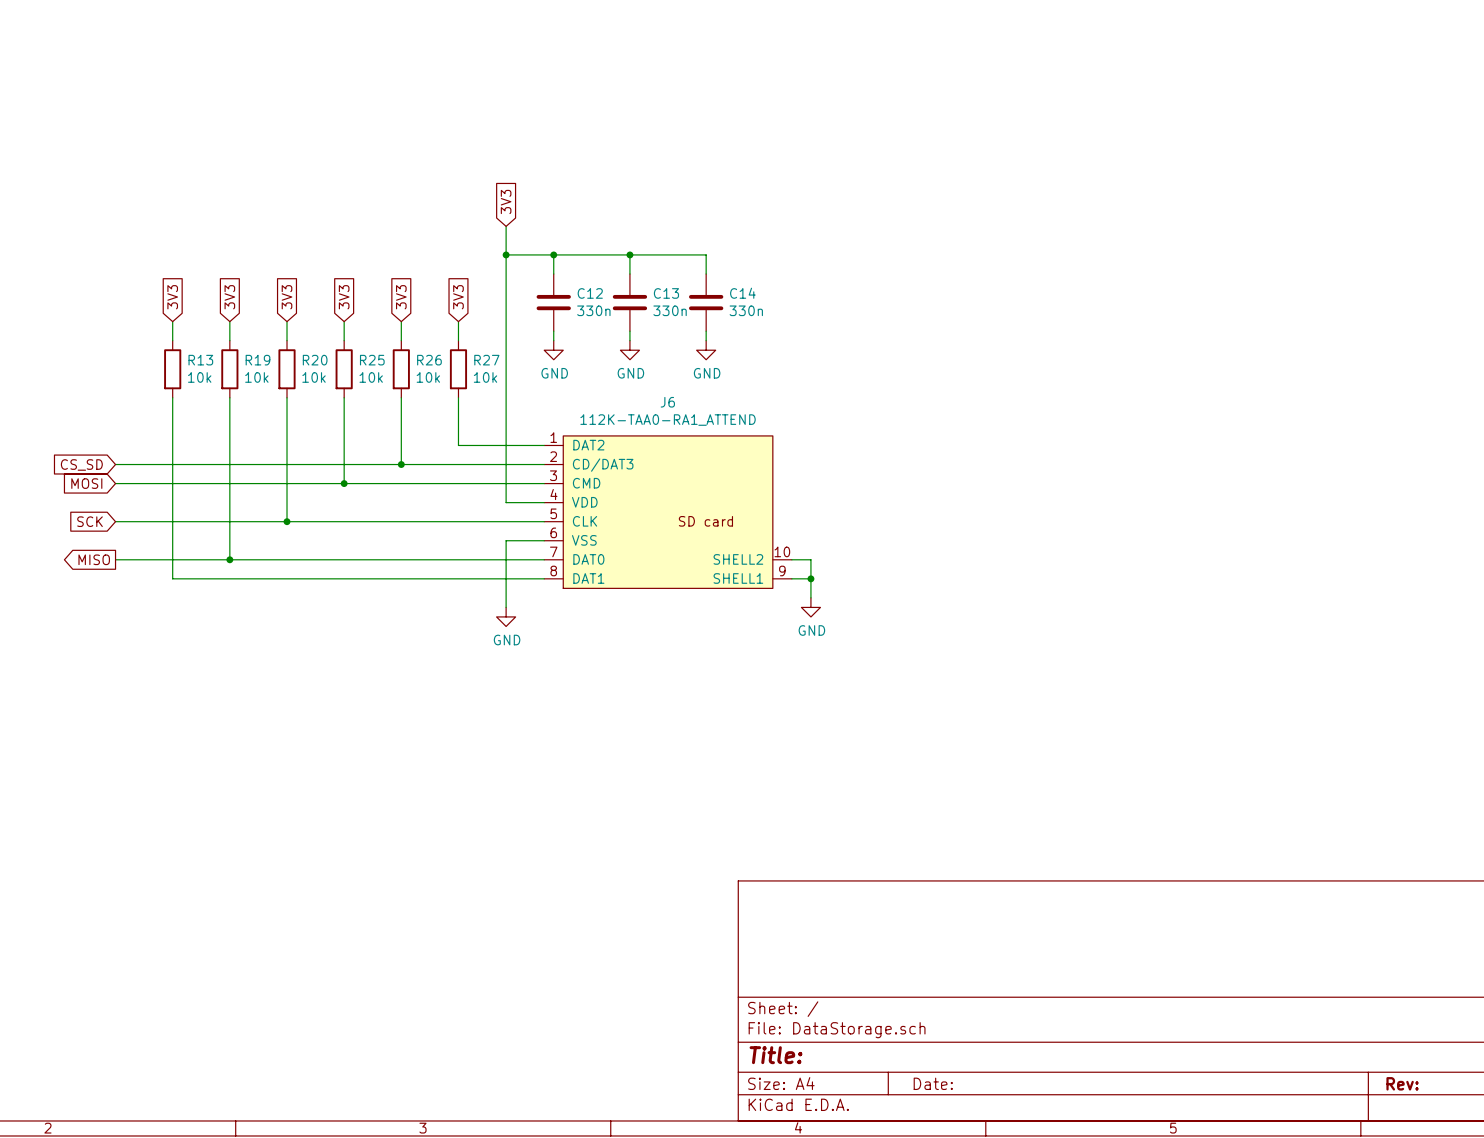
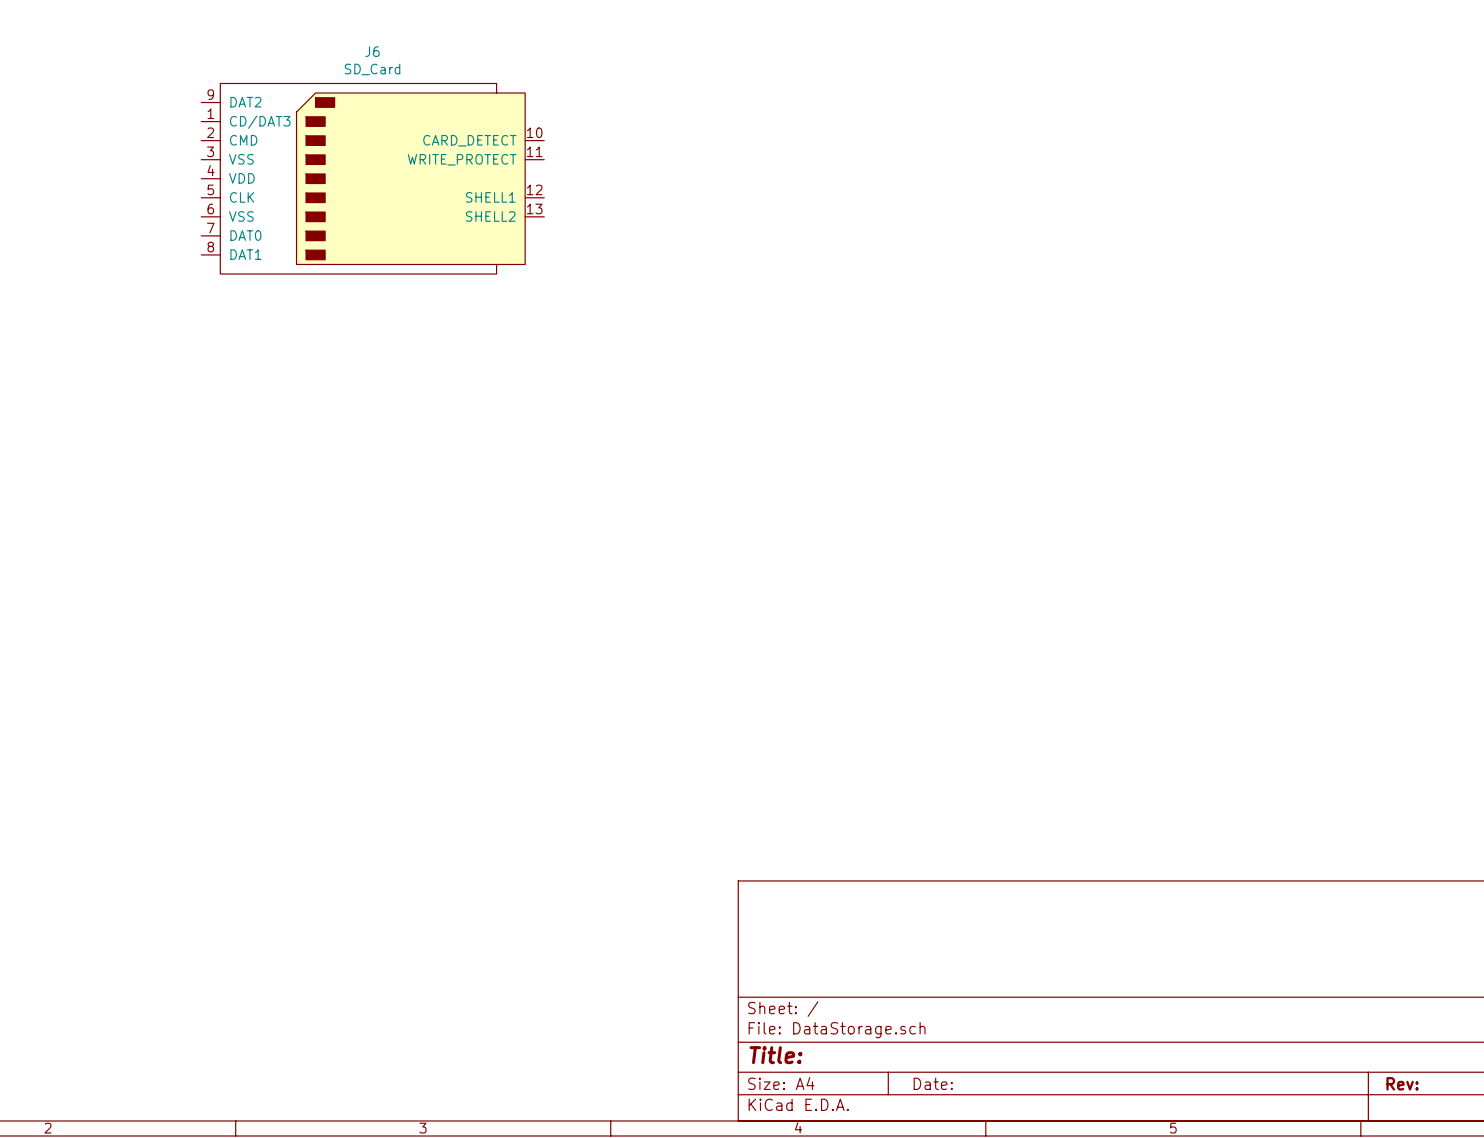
global label: 3V3 (506, 201) -> none
wire: (506, 226) (506, 502) (544, 502) -> none
wire: (506, 254) (706, 254) (706, 274) -> none
junction: (506, 254) -> none
wire: (553, 254) (553, 274) -> none
junction: (553, 254) -> none
wire: (629, 254) (629, 274) -> none
junction: (629, 254) -> none
global label: 3V3 (172, 297) -> none
global label: 3V3 (229, 297) -> none
global label: 3V3 (287, 297) -> none
global label: 3V3 (344, 297) -> none
global label: 3V3 (401, 297) -> none
global label: 3V3 (458, 297) -> none
C12: 330n (553, 302) -> none
C13: 330n (629, 302) -> none
C14: 330n (706, 302) -> none
wire: (172, 321) (172, 340) -> none
wire: (229, 321) (229, 340) -> none
wire: (287, 321) (287, 340) -> none
wire: (344, 321) (344, 340) -> none
wire: (401, 321) (401, 340) -> none
wire: (458, 321) (458, 340) -> none
wire: (553, 331) (553, 340) -> none
wire: (629, 331) (629, 340) -> none
wire: (706, 331) (706, 340) -> none
power symbol: GND (553, 350) -> none
power symbol: GND (629, 350) -> none
power symbol: GND (706, 350) -> none
R13: 10k (172, 369) -> none
R19: 10k (229, 369) -> none
R20: 10k (287, 369) -> none
R25: 10k (344, 369) -> none
R26: 10k (401, 369) -> none
R27: 10k (458, 369) -> none
wire: (172, 397) (172, 578) (544, 578) -> none
wire: (229, 397) (229, 559) -> none
wire: (287, 397) (287, 521) -> none
wire: (344, 397) (344, 483) -> none
wire: (401, 397) (401, 464) -> none
wire: (458, 397) (458, 445) (544, 445) -> none
J6 name position: J6 (667, 402) -> J6 (372, 51)
J6 value: 112K-TAA0-RA1_ATTEND (668, 420) -> SD_Card (372, 69)
J6 symbol: [544, 435, 792, 589] -> [201, 83, 545, 275]
global label: CS_SD (81, 464) -> none
wire: (115, 464) (544, 464) -> none
junction: (401, 464) -> none
global label: MOSI (86, 483) -> none
wire: (115, 483) (544, 483) -> none
junction: (344, 483) -> none
global label: SCK (90, 521) -> none
wire: (115, 521) (544, 521) -> none
junction: (287, 521) -> none
wire: (544, 540) (506, 540) (506, 607) -> none
global label: MISO (94, 559) -> none
wire: (115, 559) (544, 559) -> none
junction: (229, 559) -> none
wire: (791, 559) (810, 559) (810, 597) -> none
wire: (791, 578) (810, 578) -> none
junction: (810, 578) -> none
power symbol: GND (810, 607) -> none
power symbol: GND (506, 616) -> none

